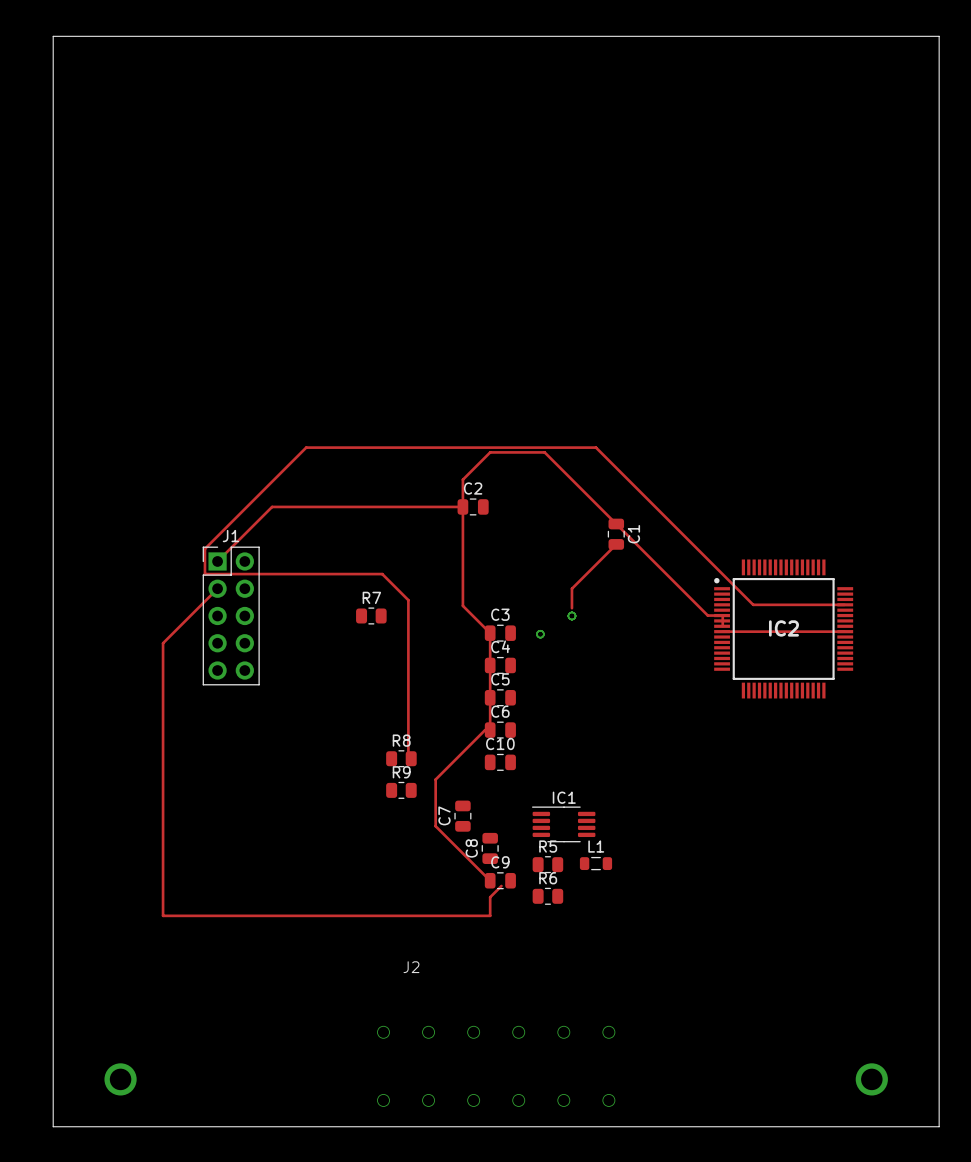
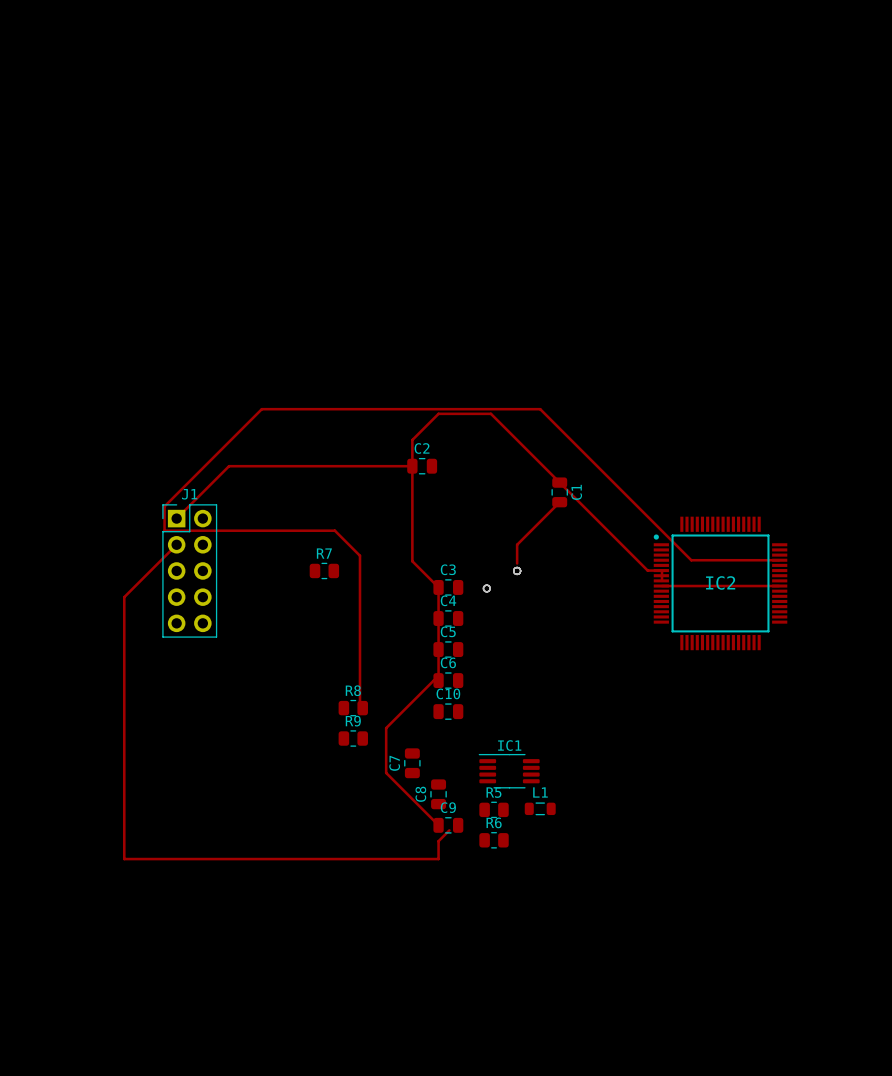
J2: (496, 581) -> none

